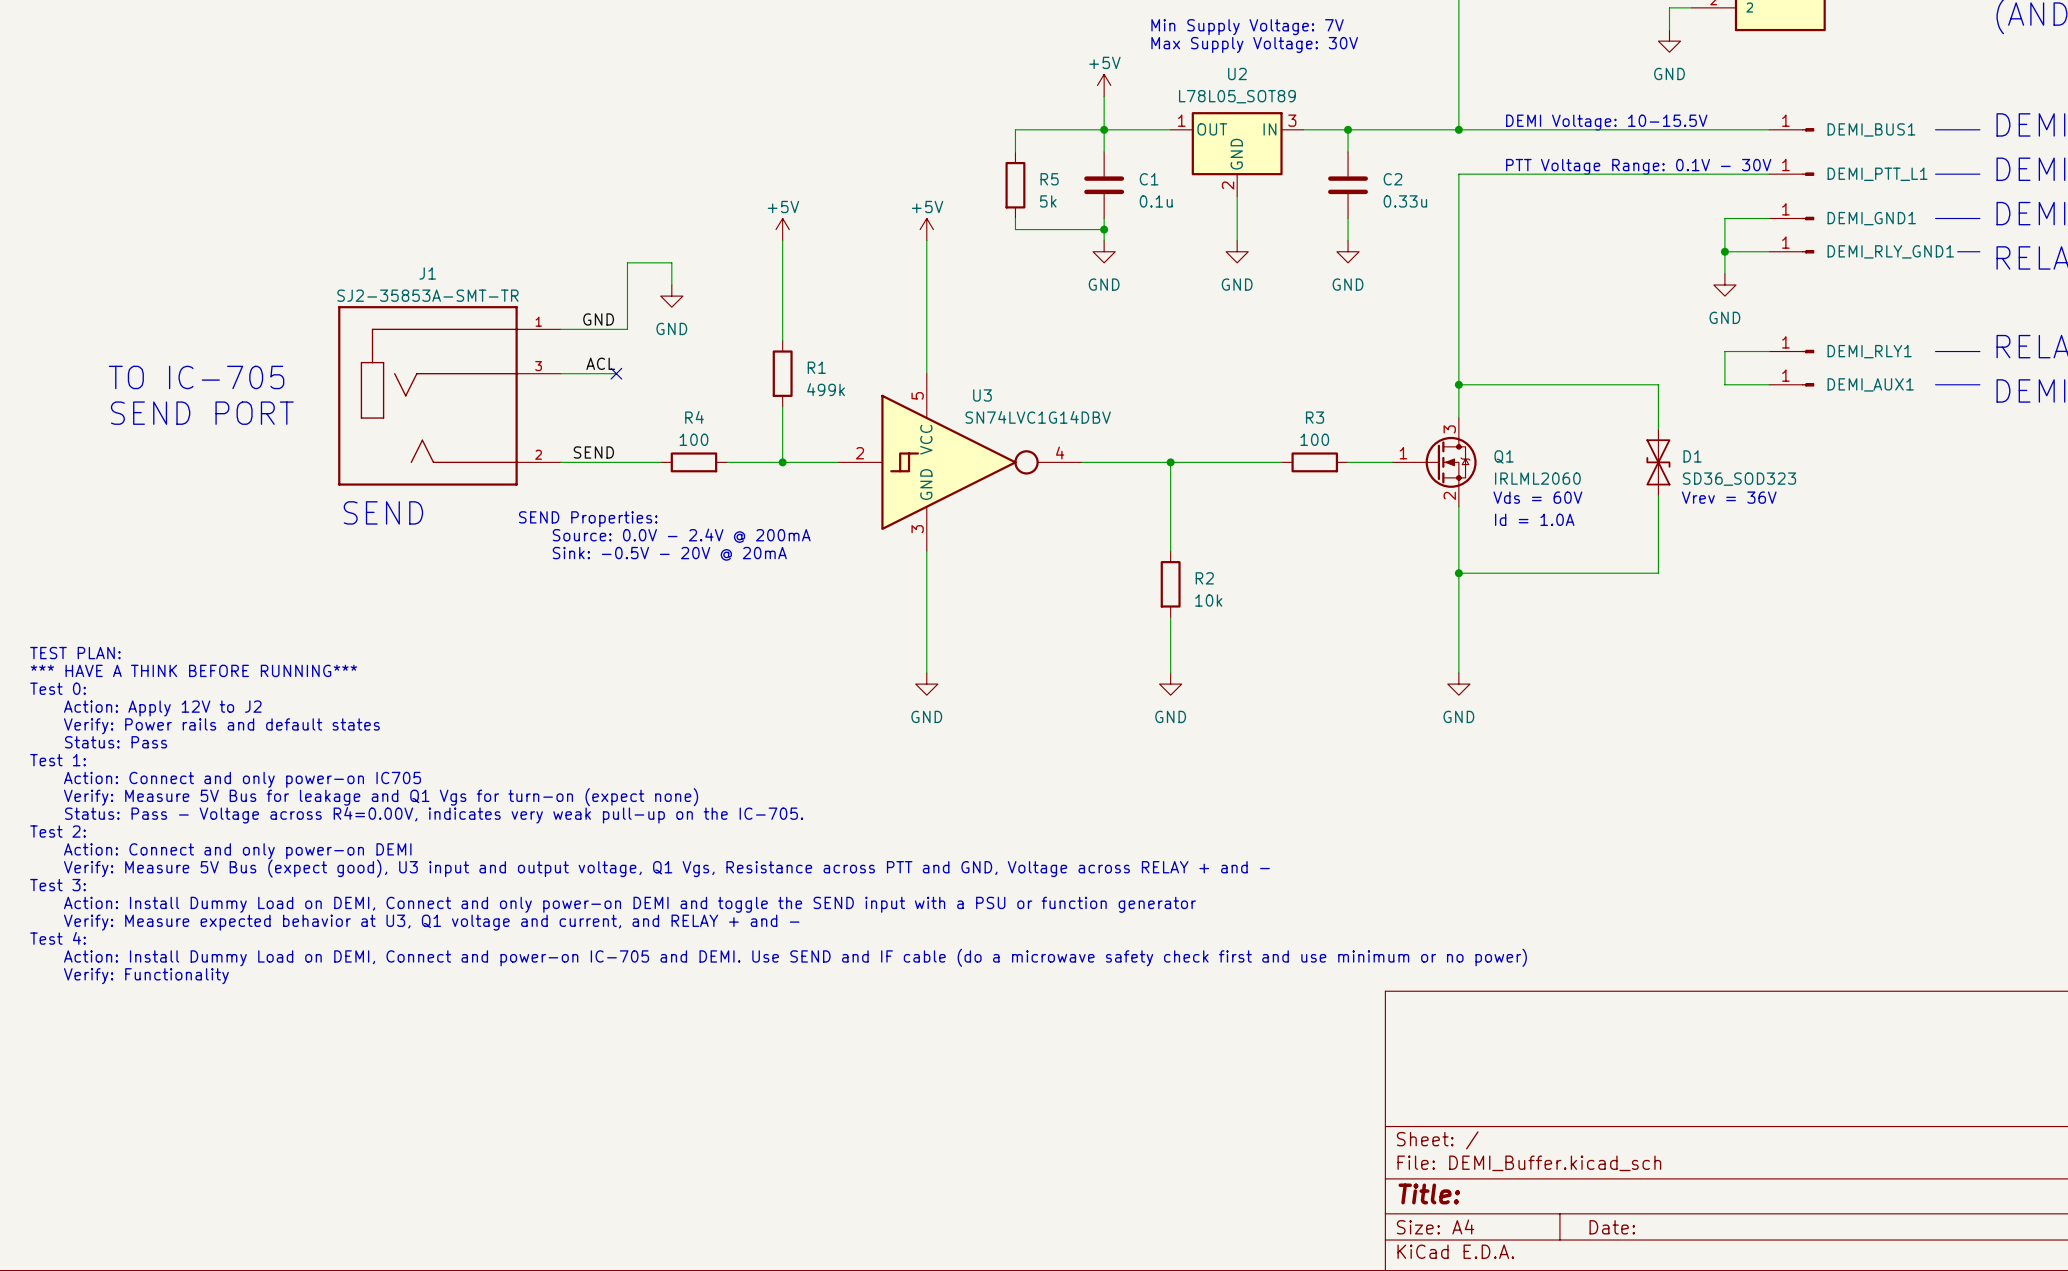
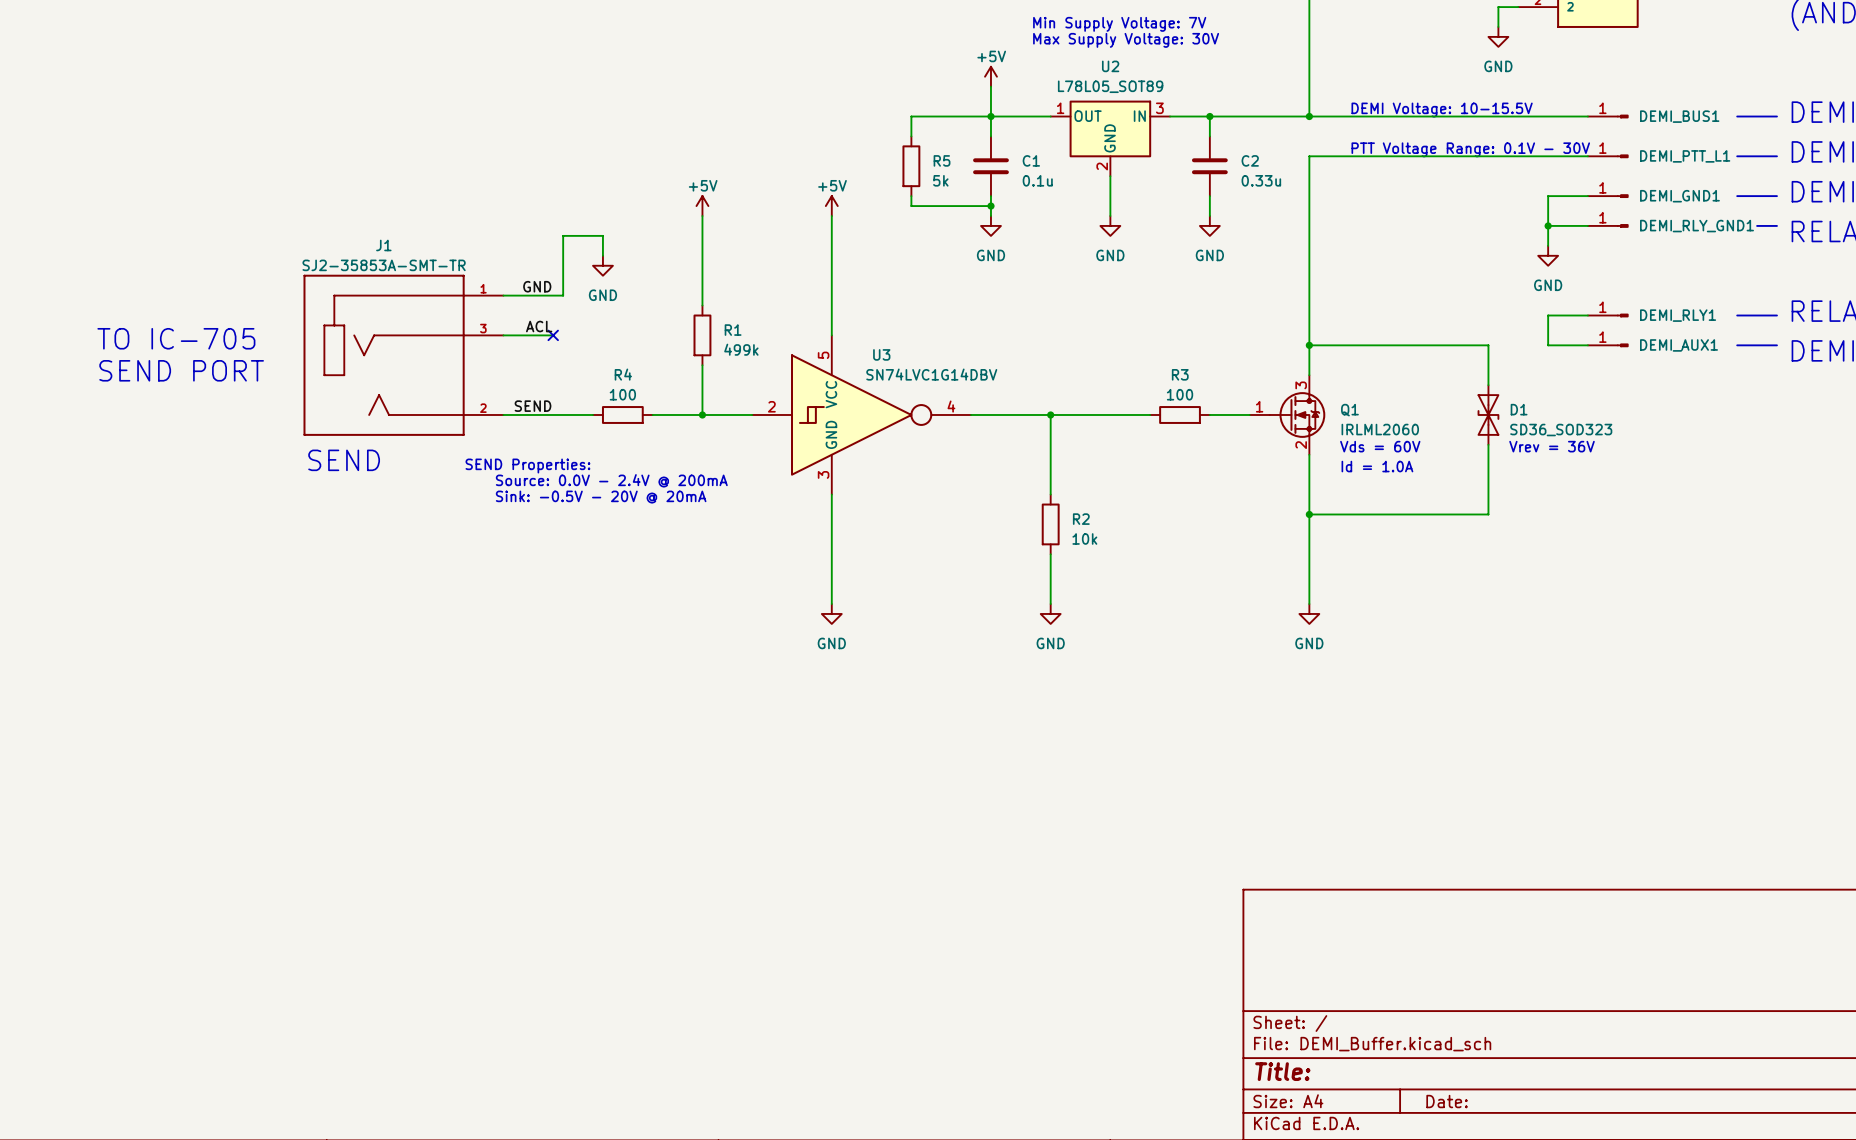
text: TEST PLAN: (75, 653) -> none
text: *** HAVE A THINK BEFORE RUNNING*** (193, 670) -> none
text: Test 0: (57, 688) -> none
text: Action: Apply 12V to J2 (162, 708) -> none
text: Verify: Power rails and default states (221, 726) -> none
text: Status: Pass (116, 742) -> none
text: Test 1: (57, 760) -> none
text: Action: Connect and only power-on IC705 (242, 779) -> none
text: Verify: Measure 5V Bus for leakage and Q1 Vgs for turn-on (expect none) (381, 797) -> none
text: Status: Pass - Voltage across R4=0.00V, indicates very weak pull-up on the IC-705. (434, 815) -> none
text: Test 2: (57, 831) -> none
text: Action: Connect and only power-on DEMI (237, 851) -> none
text: Verify: Measure 5V Bus (expect good), U3 input and output voltage, Q1 Vgs, Resistance across PTT and GND, Voltage across RELAY + and - (666, 868) -> none
text: Test 3: (57, 885) -> none
text: Action: Install Dummy Load on DEMI, Connect and only power-on DEMI and toggle the SEND input with a PSU or function generator (629, 904) -> none
text: Verify: Measure expected behavior at U3, Q1 voltage and current, and RELAY + and - (431, 922) -> none
text: Test 4: (57, 938) -> none
text: Action: Install Dummy Load on DEMI, Connect and power-on IC-705 and DEMI. Use SEND and IF cable (do a microwave safety check first and use minimum or no power) (795, 957) -> none
text: Verify: Functionality (146, 976) -> none

